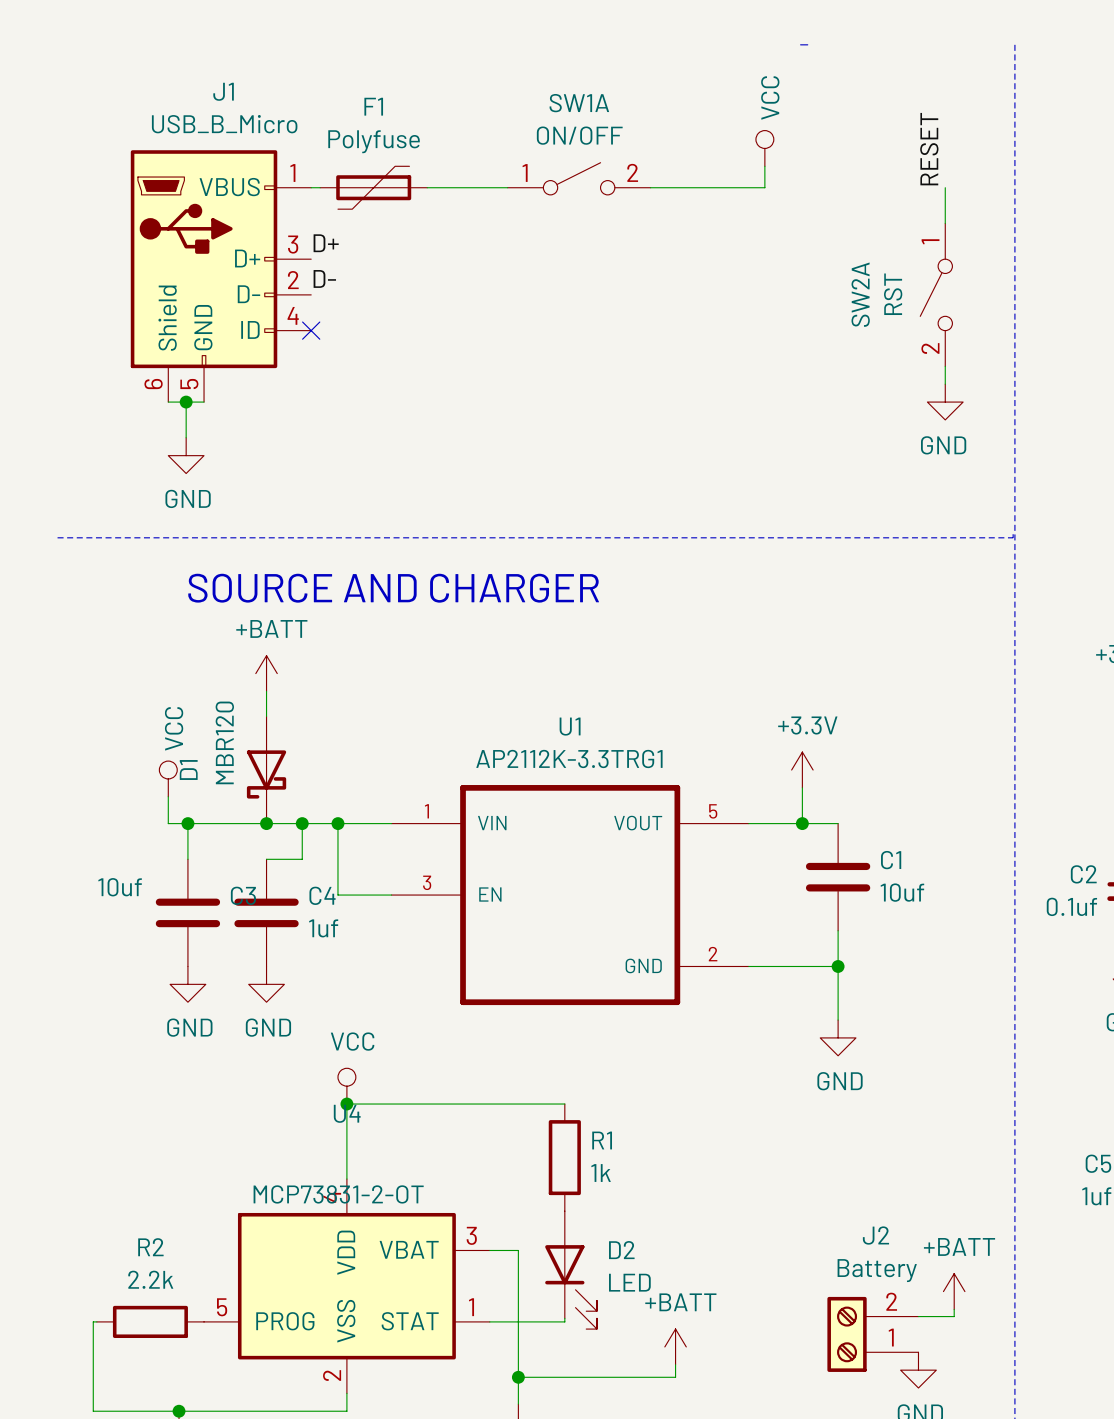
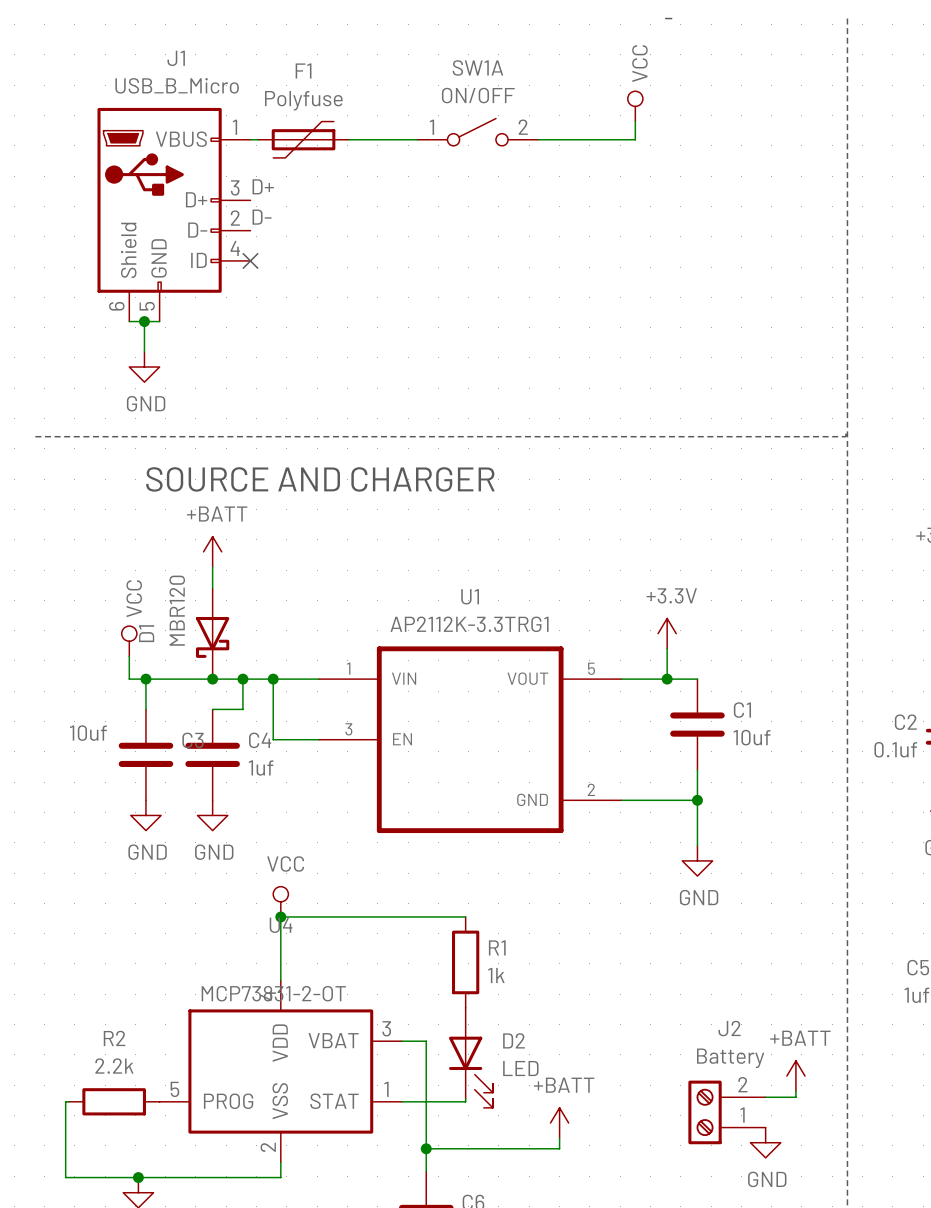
label: RESET (929, 149) -> none
wire: (945, 187) (945, 223) -> none
SW2A: RST (936, 294) -> none
wire: (945, 366) (945, 384) -> none
power symbol: GND (945, 402) -> none

